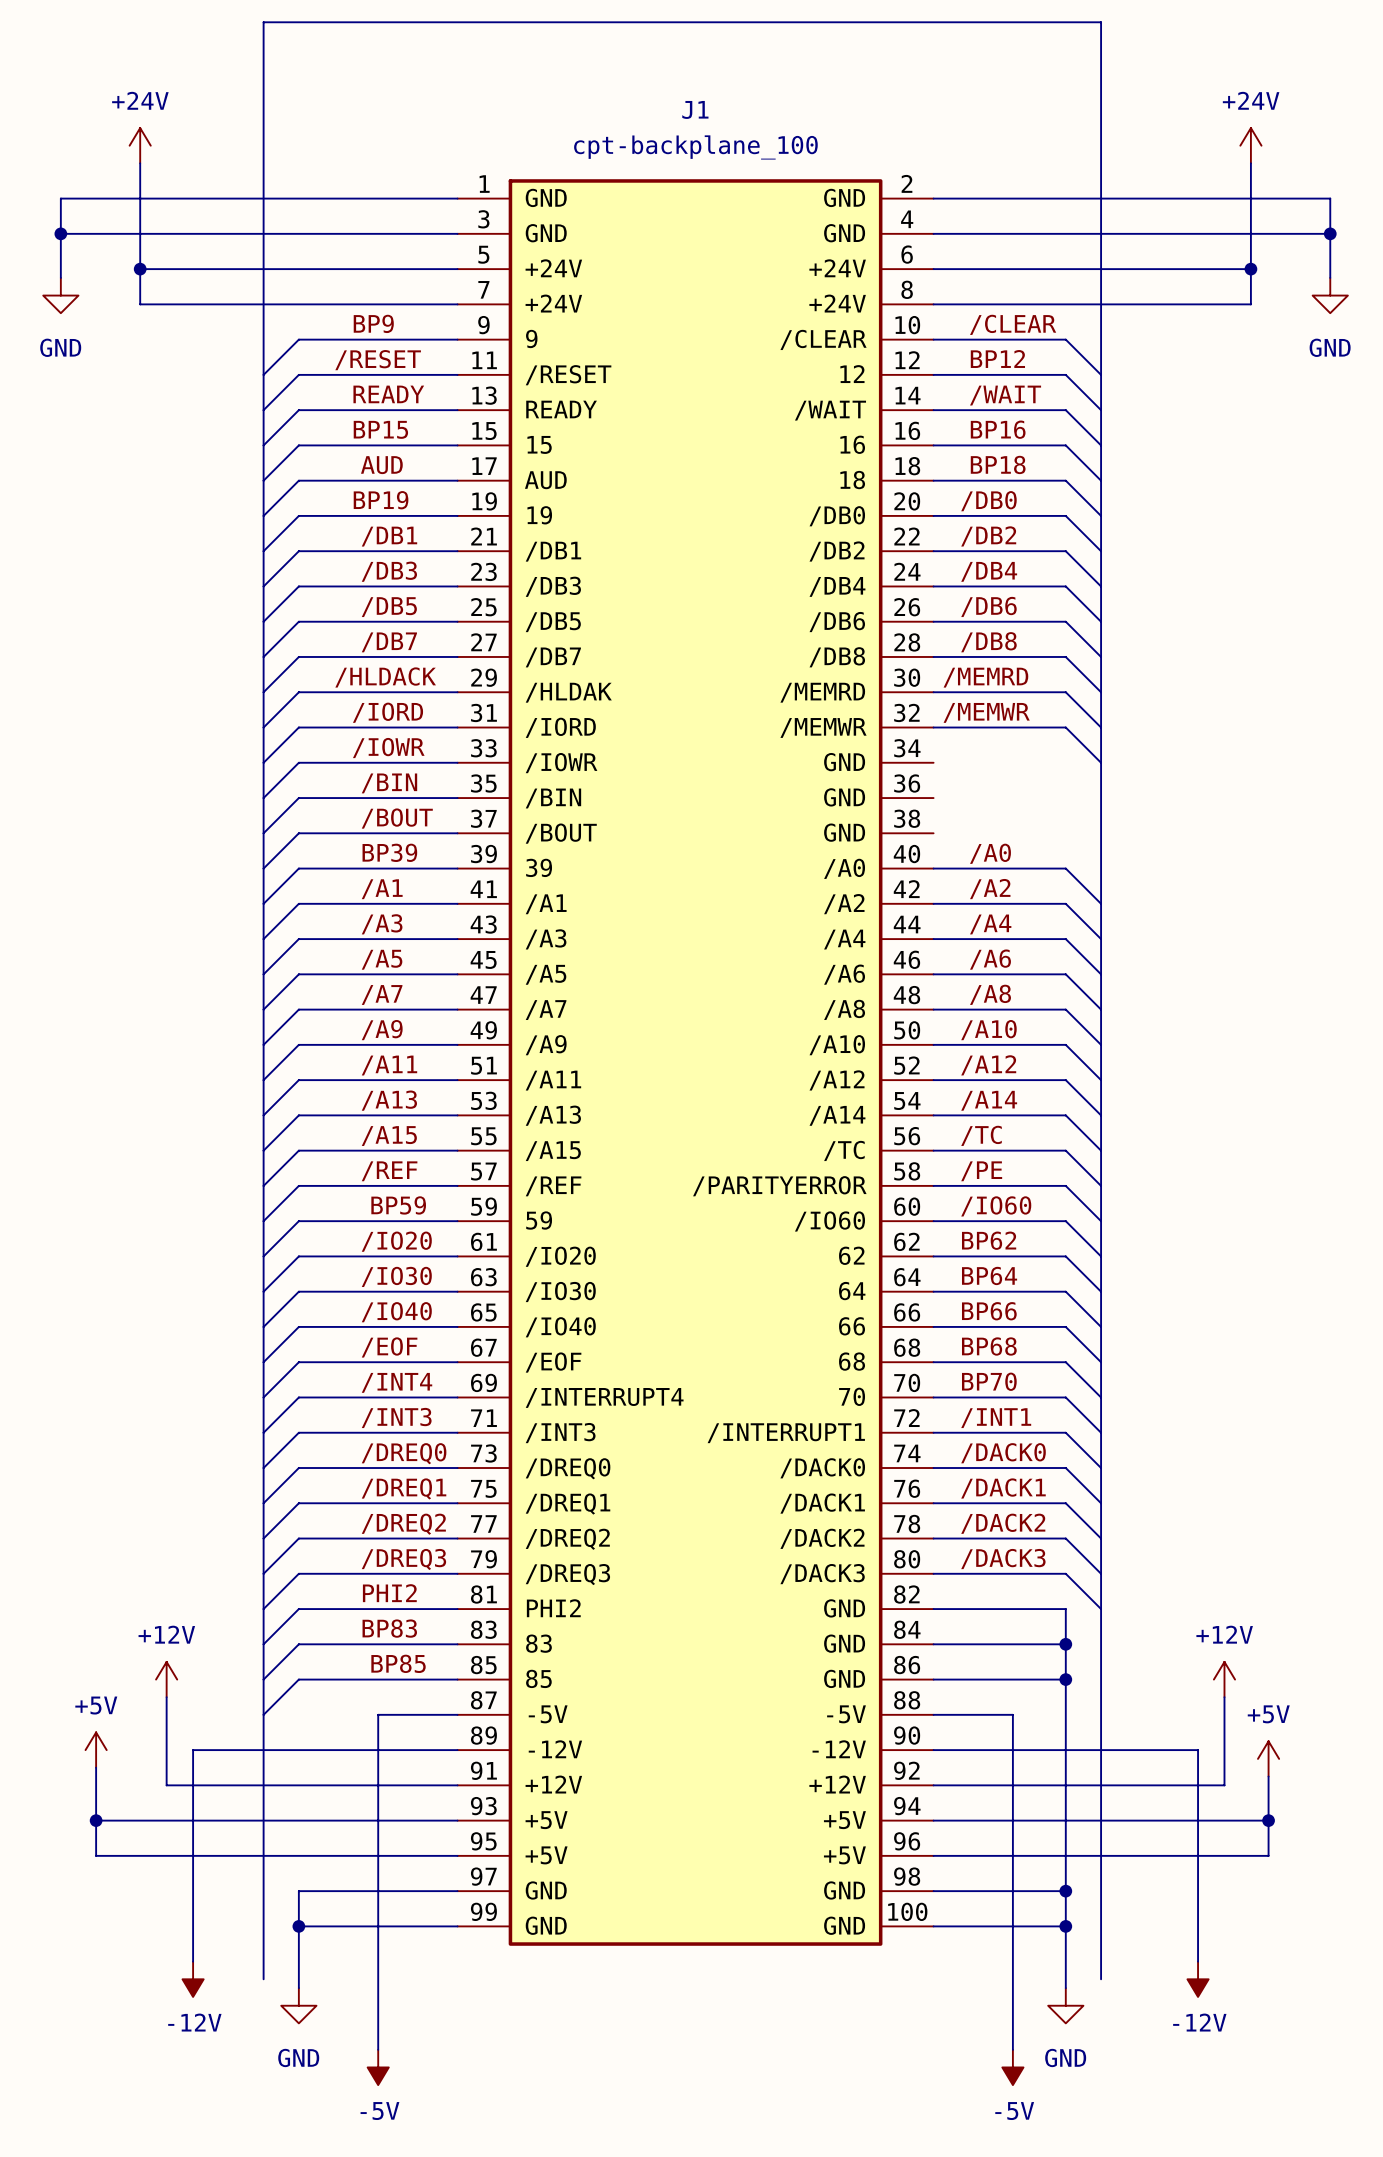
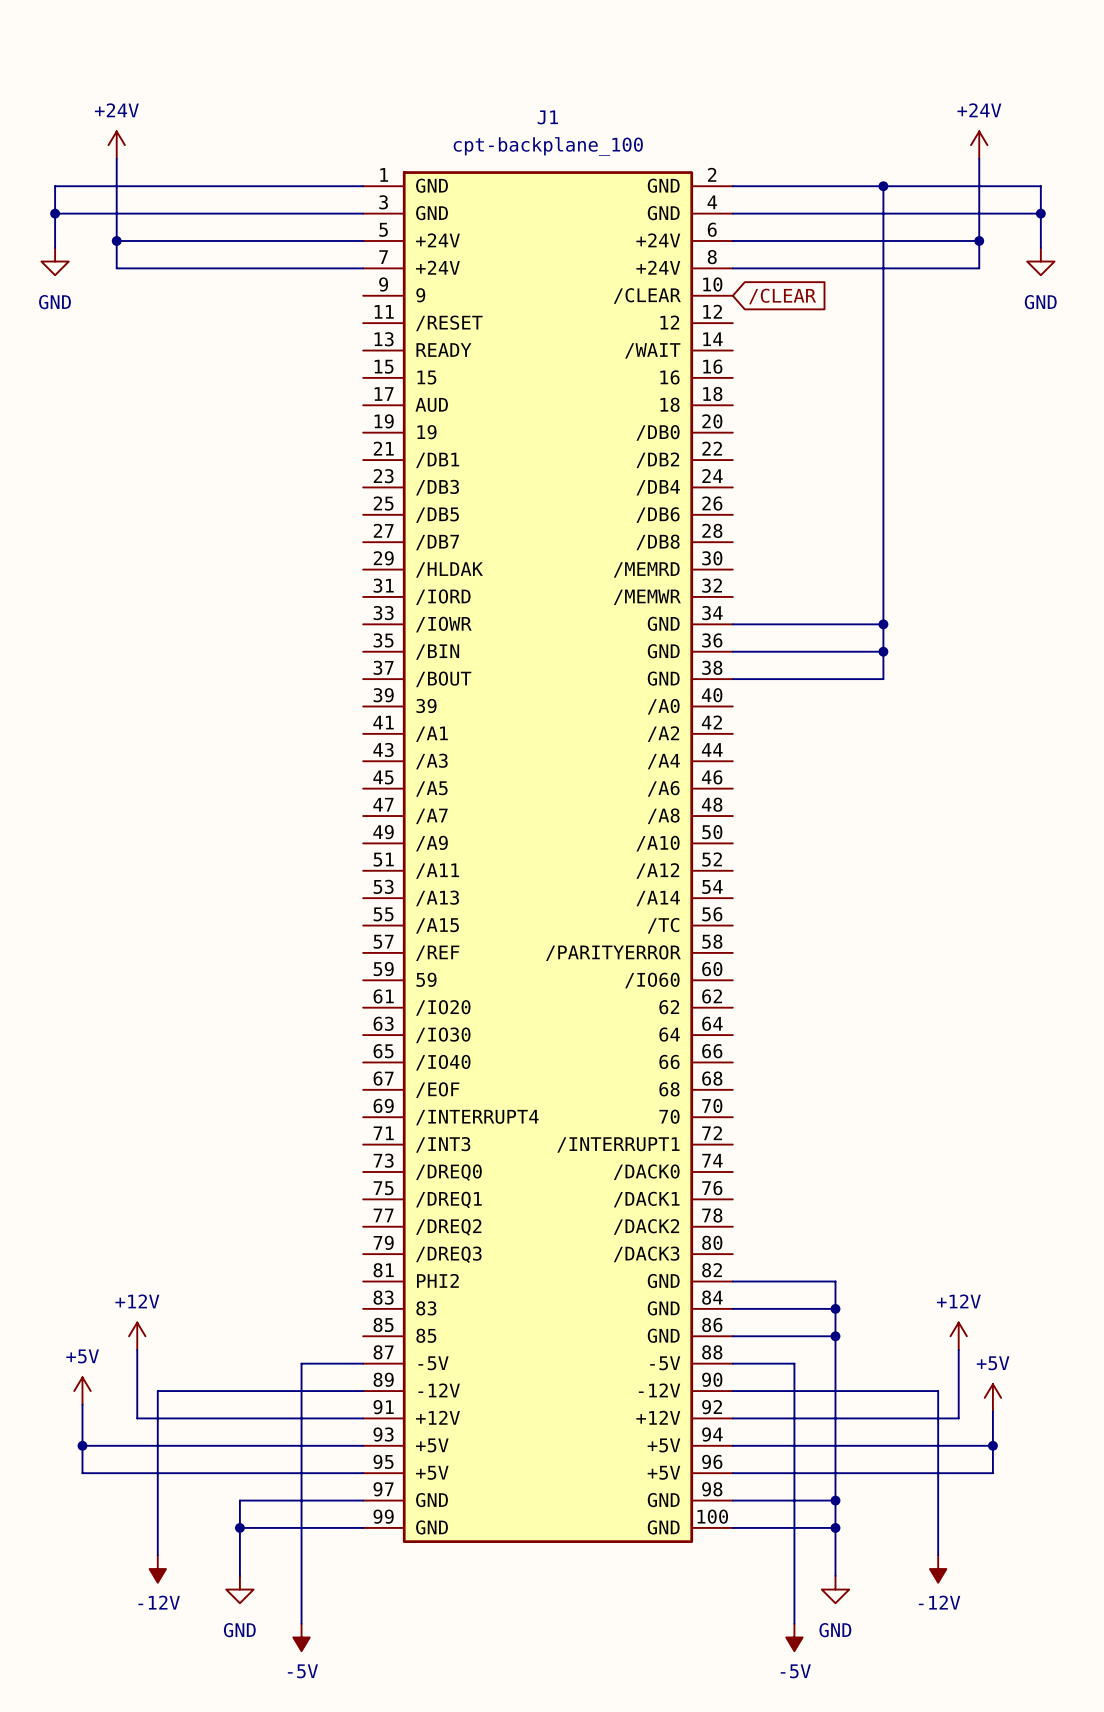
wire: none -> (883, 186) (883, 679) (732, 679)
junction: none -> (883, 186)
label: BP9 (373, 323) -> none
label: /CLEAR (1013, 324) -> none
wire: (457, 339) (298, 339) (263, 374) -> none
wire: (933, 339) (1065, 339) (1101, 374) -> none
global label: none -> /CLEAR (782, 296)
label: BP12 (997, 359) -> none
label: /RESET (378, 360) -> none
wire: (457, 374) (298, 374) (263, 410) -> none
wire: (933, 374) (1065, 374) (1101, 410) -> none
label: READY (388, 394) -> none
label: /WAIT (1005, 395) -> none
wire: (457, 410) (298, 410) (263, 445) -> none
wire: (933, 410) (1065, 410) (1101, 445) -> none
label: BP15 (380, 429) -> none
label: BP16 (998, 429) -> none
wire: (457, 445) (298, 445) (263, 480) -> none
wire: (933, 445) (1065, 445) (1101, 480) -> none
label: BP18 (998, 464) -> none
label: AUD (381, 465) -> none
wire: (457, 480) (298, 480) (263, 515) -> none
wire: (933, 480) (1065, 480) (1101, 515) -> none
label: BP19 (381, 500) -> none
label: /DB0 (988, 501) -> none
wire: (457, 515) (298, 515) (263, 551) -> none
wire: (933, 515) (1065, 515) (1101, 551) -> none
label: /DB1 (389, 536) -> none
label: /DB2 (988, 536) -> none
wire: (457, 551) (298, 551) (263, 586) -> none
wire: (933, 551) (1065, 551) (1101, 586) -> none
label: /DB3 (389, 571) -> none
label: /DB4 (989, 571) -> none
wire: (457, 586) (298, 586) (263, 621) -> none
wire: (933, 586) (1065, 586) (1101, 621) -> none
label: /DB6 (988, 606) -> none
label: /DB5 (389, 607) -> none
wire: (457, 621) (298, 621) (263, 656) -> none
wire: (933, 621) (1065, 621) (1101, 656) -> none
label: /DB7 (389, 642) -> none
label: /DB8 (988, 642) -> none
wire: (457, 656) (298, 656) (263, 692) -> none
wire: (933, 656) (1065, 656) (1101, 692) -> none
label: /HLDACK (385, 677) -> none
label: /MEMRD (985, 677) -> none
wire: (457, 692) (298, 692) (263, 727) -> none
wire: (933, 692) (1065, 692) (1101, 727) -> none
label: /IORD (388, 712) -> none
label: /MEMWR (986, 712) -> none
wire: (457, 727) (298, 727) (263, 762) -> none
wire: (933, 727) (1065, 727) (1101, 762) -> none
label: /IOWR (388, 748) -> none
wire: (457, 762) (298, 762) (263, 798) -> none
wire: none -> (732, 624) (883, 624)
junction: none -> (883, 624)
label: /BIN (389, 783) -> none
wire: (457, 798) (298, 798) (263, 833) -> none
wire: none -> (732, 651) (883, 651)
junction: none -> (883, 651)
label: /BOUT (397, 818) -> none
wire: (457, 833) (298, 833) (263, 868) -> none
label: BP39 (389, 852) -> none
label: /A0 (990, 853) -> none
wire: (457, 868) (298, 868) (263, 903) -> none
wire: (933, 868) (1065, 868) (1101, 903) -> none
label: /A1 (382, 889) -> none
label: /A2 (990, 889) -> none
wire: (457, 903) (298, 903) (263, 939) -> none
wire: (933, 903) (1065, 903) (1101, 939) -> none
label: /A3 (382, 924) -> none
label: /A4 (990, 924) -> none
wire: (457, 939) (298, 939) (263, 974) -> none
wire: (933, 939) (1065, 939) (1101, 974) -> none
label: /A5 (382, 959) -> none
label: /A6 (990, 959) -> none
wire: (457, 974) (298, 974) (263, 1009) -> none
wire: (933, 974) (1065, 974) (1101, 1009) -> none
label: /A7 (382, 994) -> none
label: /A8 (990, 994) -> none
wire: (457, 1009) (298, 1009) (263, 1044) -> none
wire: (933, 1009) (1065, 1009) (1101, 1044) -> none
label: /A9 (382, 1030) -> none
label: /A10 (988, 1030) -> none
wire: (457, 1044) (298, 1044) (263, 1080) -> none
wire: (933, 1044) (1065, 1044) (1101, 1080) -> none
label: /A11 (389, 1065) -> none
label: /A12 (988, 1065) -> none
wire: (457, 1080) (298, 1080) (263, 1115) -> none
wire: (933, 1080) (1065, 1080) (1101, 1115) -> none
label: /A13 (389, 1100) -> none
label: /A14 (989, 1100) -> none
wire: (457, 1115) (298, 1115) (263, 1150) -> none
wire: (933, 1115) (1065, 1115) (1101, 1150) -> none
label: /TC (981, 1135) -> none
label: /A15 (389, 1136) -> none
wire: (457, 1150) (298, 1150) (263, 1185) -> none
wire: (933, 1150) (1065, 1150) (1101, 1185) -> none
label: /REF (389, 1171) -> none
label: /PE (981, 1171) -> none
wire: (457, 1185) (298, 1185) (263, 1221) -> none
wire: (933, 1185) (1065, 1185) (1101, 1221) -> none
label: BP59 (398, 1205) -> none
label: /IO60 (996, 1206) -> none
wire: (457, 1221) (298, 1221) (263, 1256) -> none
wire: (933, 1221) (1065, 1221) (1101, 1256) -> none
label: BP62 (989, 1240) -> none
label: /IO20 (396, 1241) -> none
wire: (457, 1256) (298, 1256) (263, 1291) -> none
wire: (933, 1256) (1065, 1256) (1101, 1291) -> none
label: BP64 (989, 1275) -> none
label: /IO30 (396, 1276) -> none
wire: (457, 1291) (298, 1291) (263, 1326) -> none
wire: (933, 1291) (1065, 1291) (1101, 1326) -> none
label: BP66 (989, 1311) -> none
label: /IO40 (396, 1312) -> none
wire: (457, 1326) (298, 1326) (263, 1362) -> none
wire: (933, 1326) (1065, 1326) (1101, 1362) -> none
label: BP68 (989, 1346) -> none
label: /EOF (389, 1347) -> none
wire: (457, 1362) (298, 1362) (263, 1397) -> none
wire: (933, 1362) (1065, 1362) (1101, 1397) -> none
label: BP70 (989, 1381) -> none
label: /INT4 (397, 1382) -> none
wire: (457, 1397) (298, 1397) (263, 1432) -> none
wire: (933, 1397) (1065, 1397) (1101, 1432) -> none
label: /INT3 (396, 1417) -> none
label: /INT1 (996, 1418) -> none
wire: (457, 1432) (298, 1432) (263, 1468) -> none
wire: (933, 1432) (1065, 1432) (1101, 1468) -> none
label: /DREQ0 (404, 1453) -> none
label: /DACK0 (1003, 1453) -> none
wire: (457, 1468) (298, 1468) (263, 1503) -> none
wire: (933, 1468) (1065, 1468) (1101, 1503) -> none
label: /DREQ1 (404, 1488) -> none
label: /DACK1 (1003, 1488) -> none
wire: (457, 1503) (298, 1503) (263, 1538) -> none
wire: (933, 1503) (1065, 1503) (1101, 1538) -> none
label: /DACK2 (1003, 1523) -> none
label: /DREQ2 (403, 1524) -> none
wire: (457, 1538) (298, 1538) (263, 1573) -> none
wire: (933, 1538) (1065, 1538) (1101, 1573) -> none
label: /DREQ3 (403, 1559) -> none
label: /DACK3 (1003, 1559) -> none
wire: (457, 1573) (298, 1573) (263, 1609) -> none
wire: (933, 1573) (1065, 1573) (1101, 1609) -> none
label: PHI2 (389, 1593) -> none
wire: (457, 1609) (298, 1609) (263, 1644) -> none
label: BP83 (389, 1628) -> none
wire: (457, 1644) (298, 1644) (263, 1679) -> none
label: BP85 (398, 1663) -> none
wire: (457, 1679) (298, 1679) (263, 1714) -> none
bus: (263, 1979) (263, 22) (1101, 22) (1101, 1979) -> none

